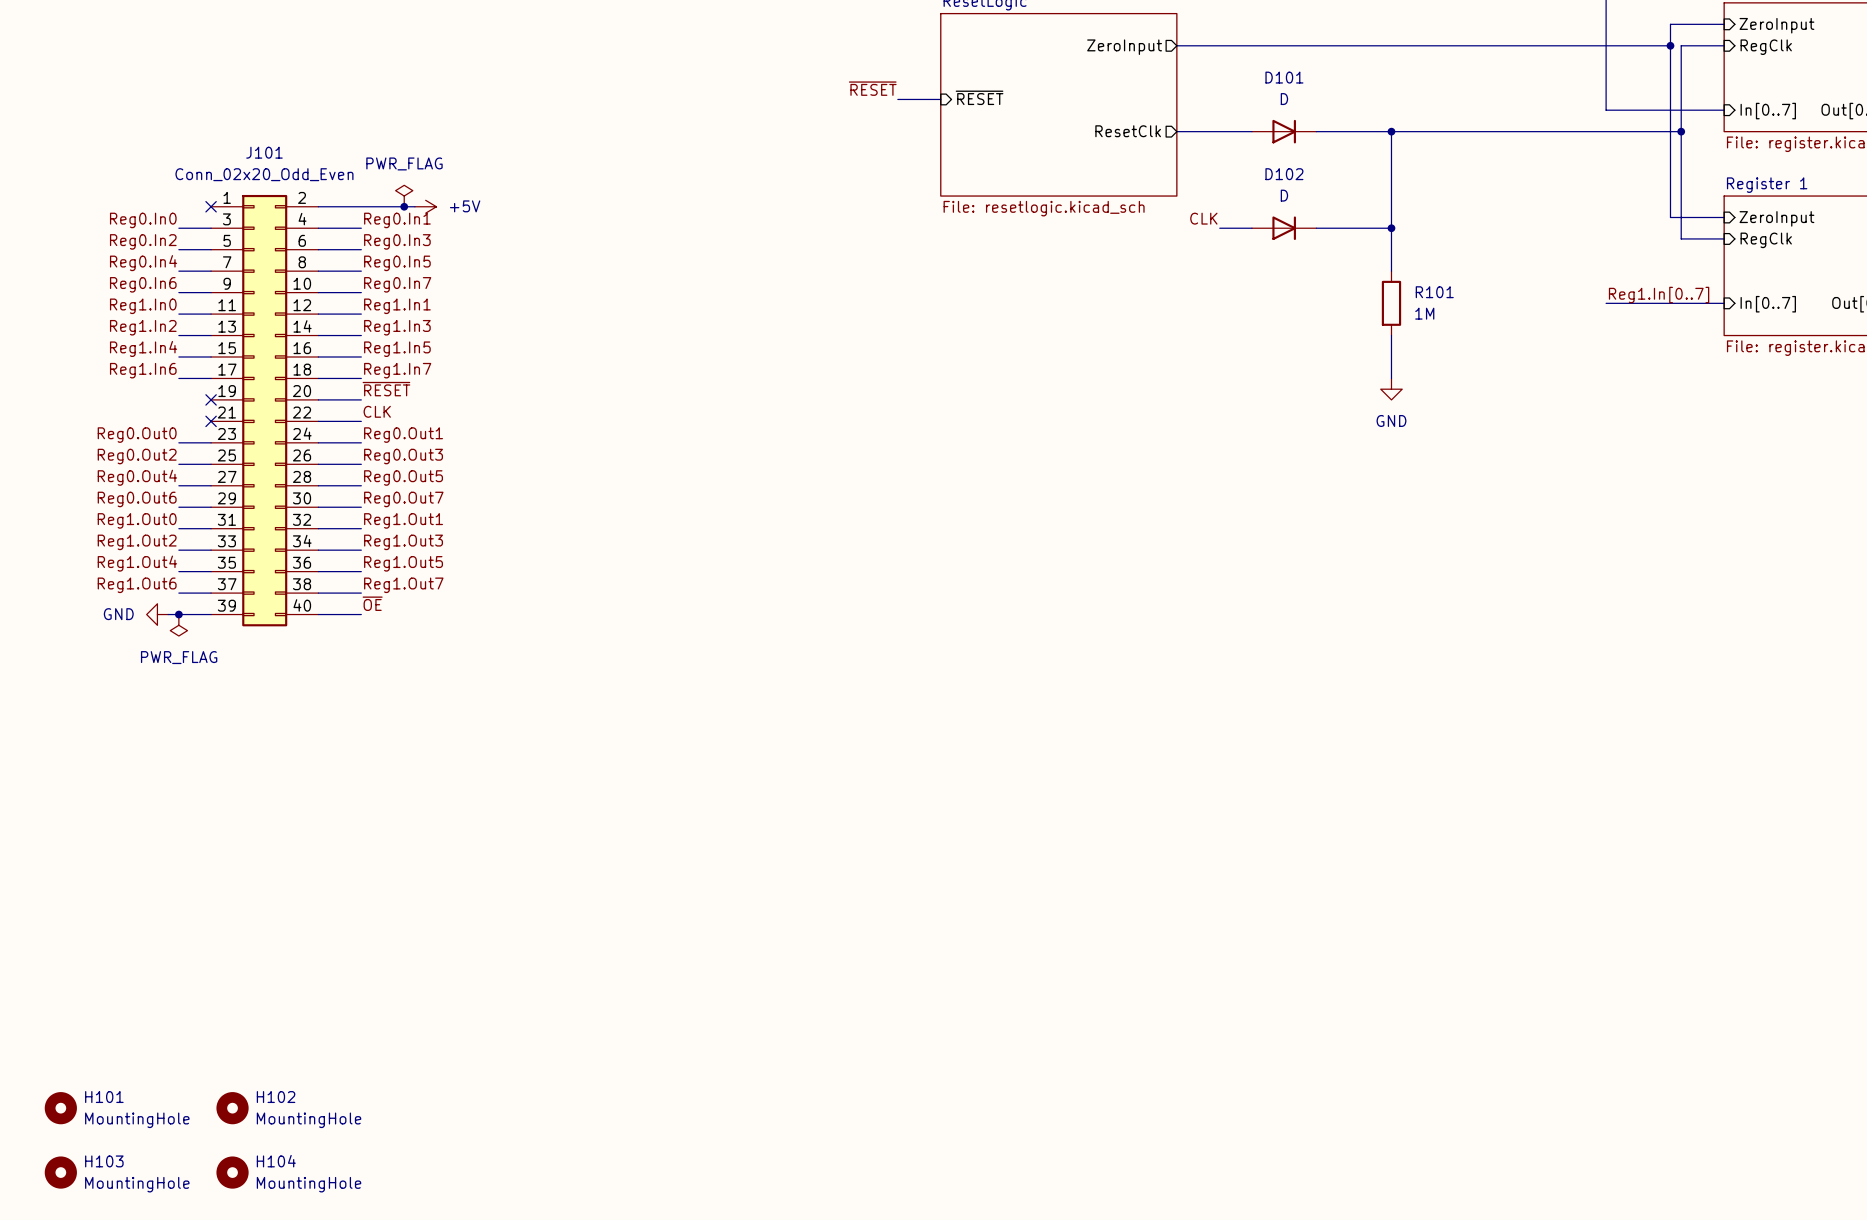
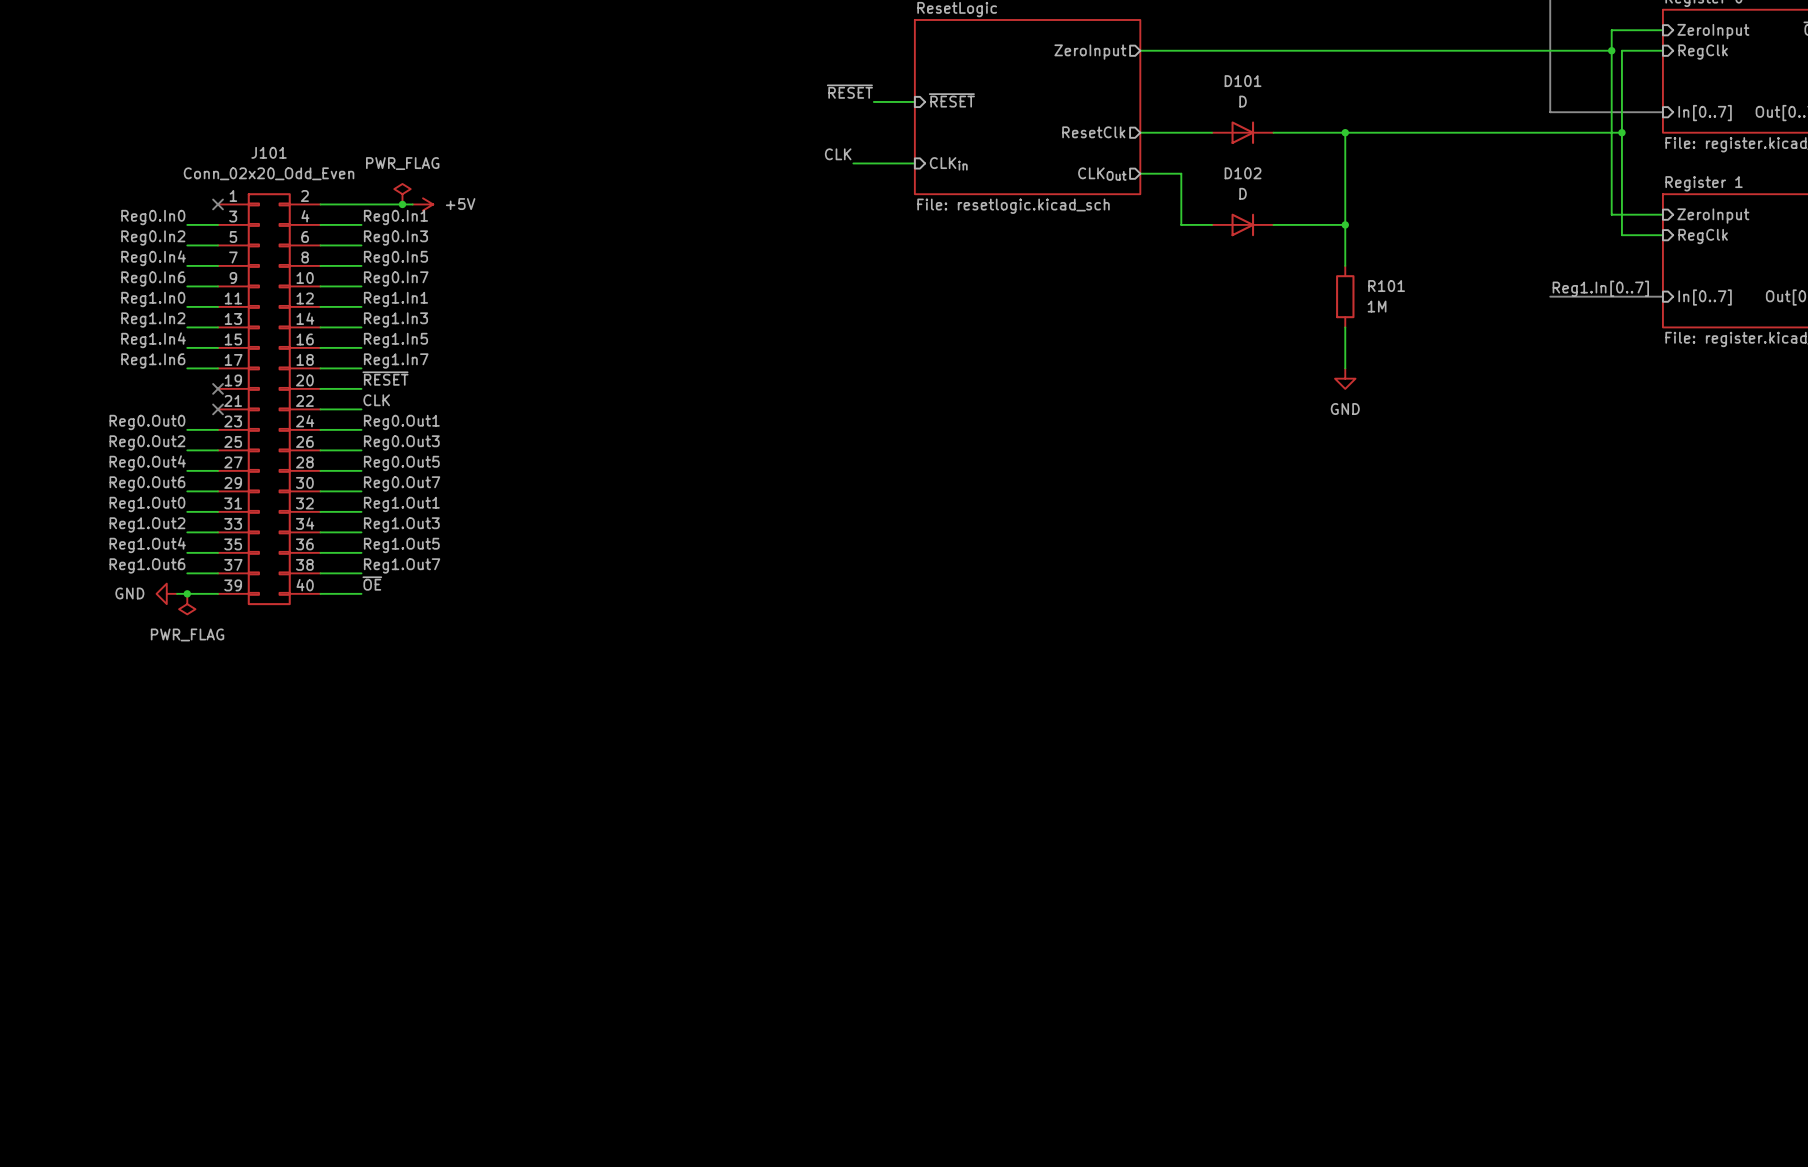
label: none -> CLK (838, 154)
wire: none -> (853, 163) (914, 163)
sheet pin: none -> CLKin (948, 163)
sheet pin: none -> CLKOut (1102, 174)
wire: none -> (1140, 173) (1181, 173) (1181, 224)
label: CLK (1203, 218) -> none
H101: MountingHole (60, 1108) -> none
H102: MountingHole (232, 1108) -> none
H103: MountingHole (60, 1172) -> none
H104: MountingHole (232, 1172) -> none

